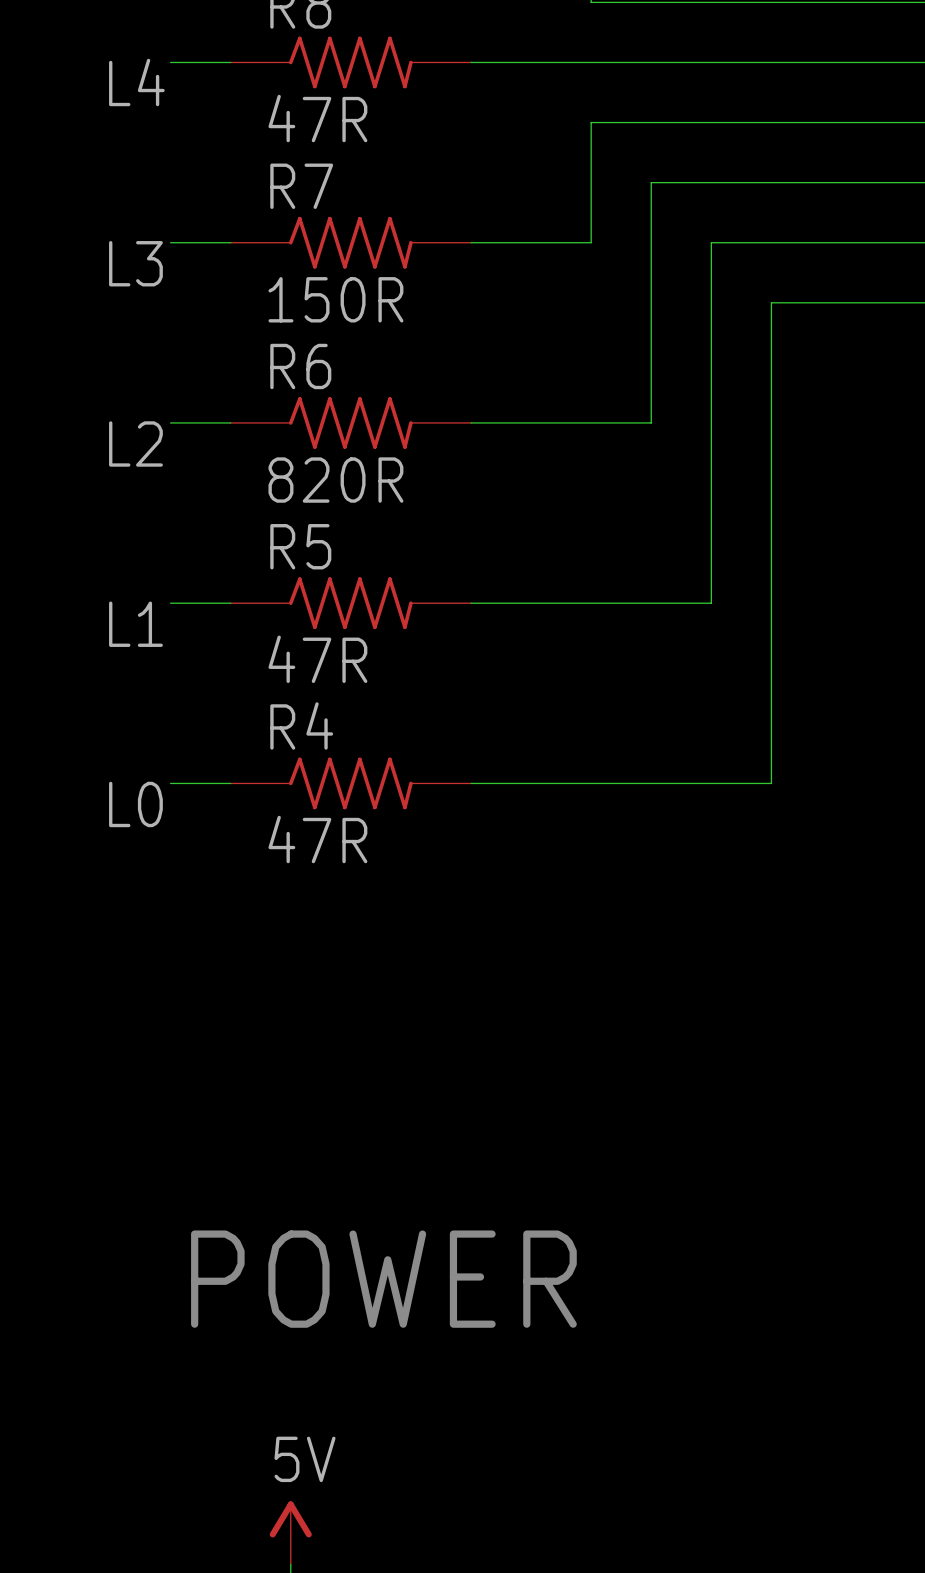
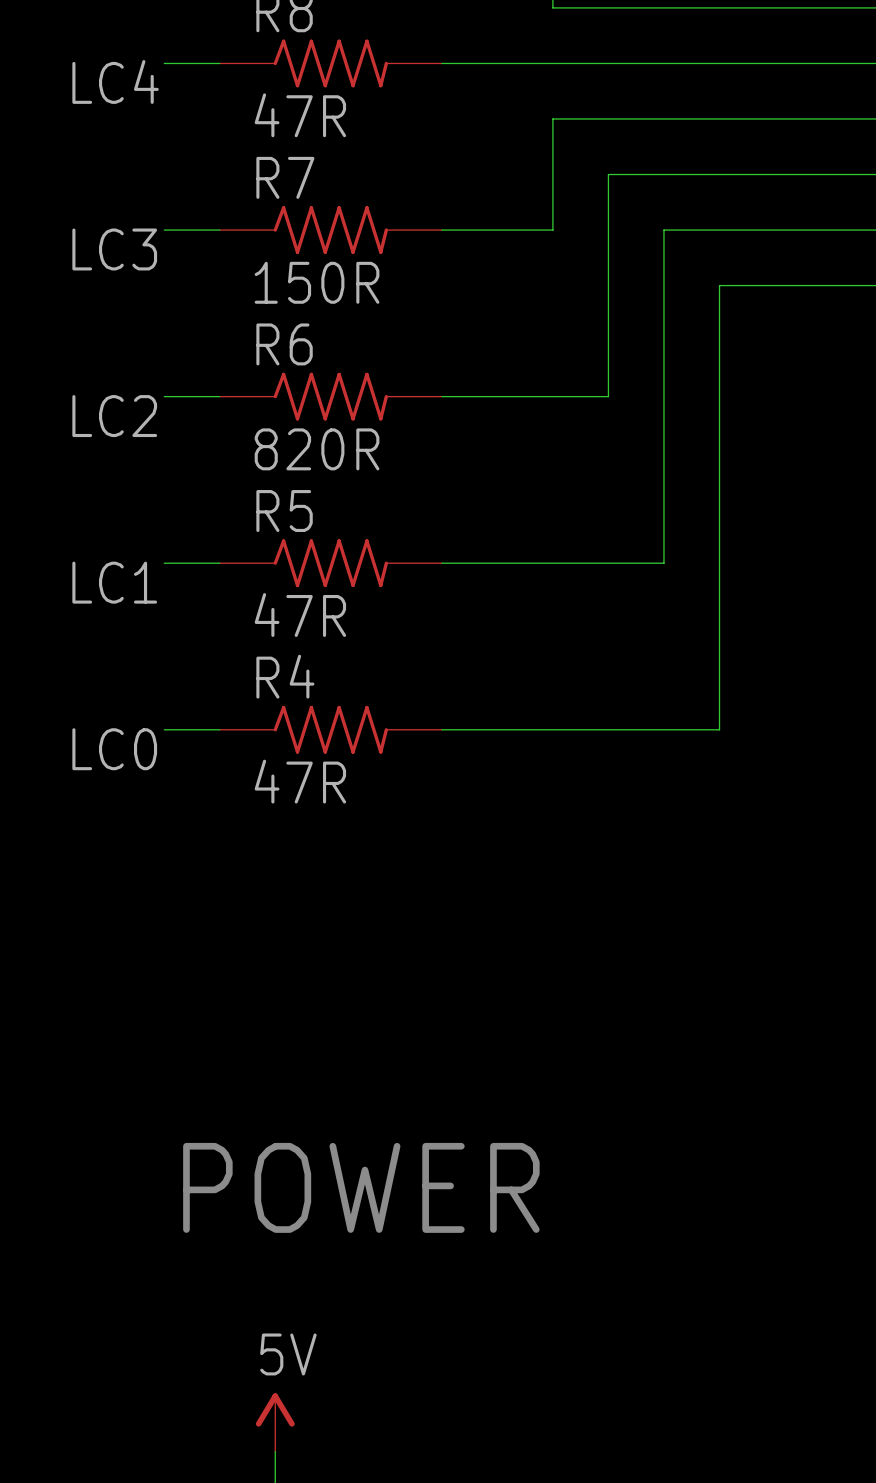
label: L4 (136, 82) -> LC4 (115, 81)
label: L3 (135, 263) -> LC3 (114, 249)
label: L2 (135, 443) -> LC2 (114, 416)
label: L1 (135, 624) -> LC1 (114, 582)
label: L0 (135, 804) -> LC0 (114, 749)

